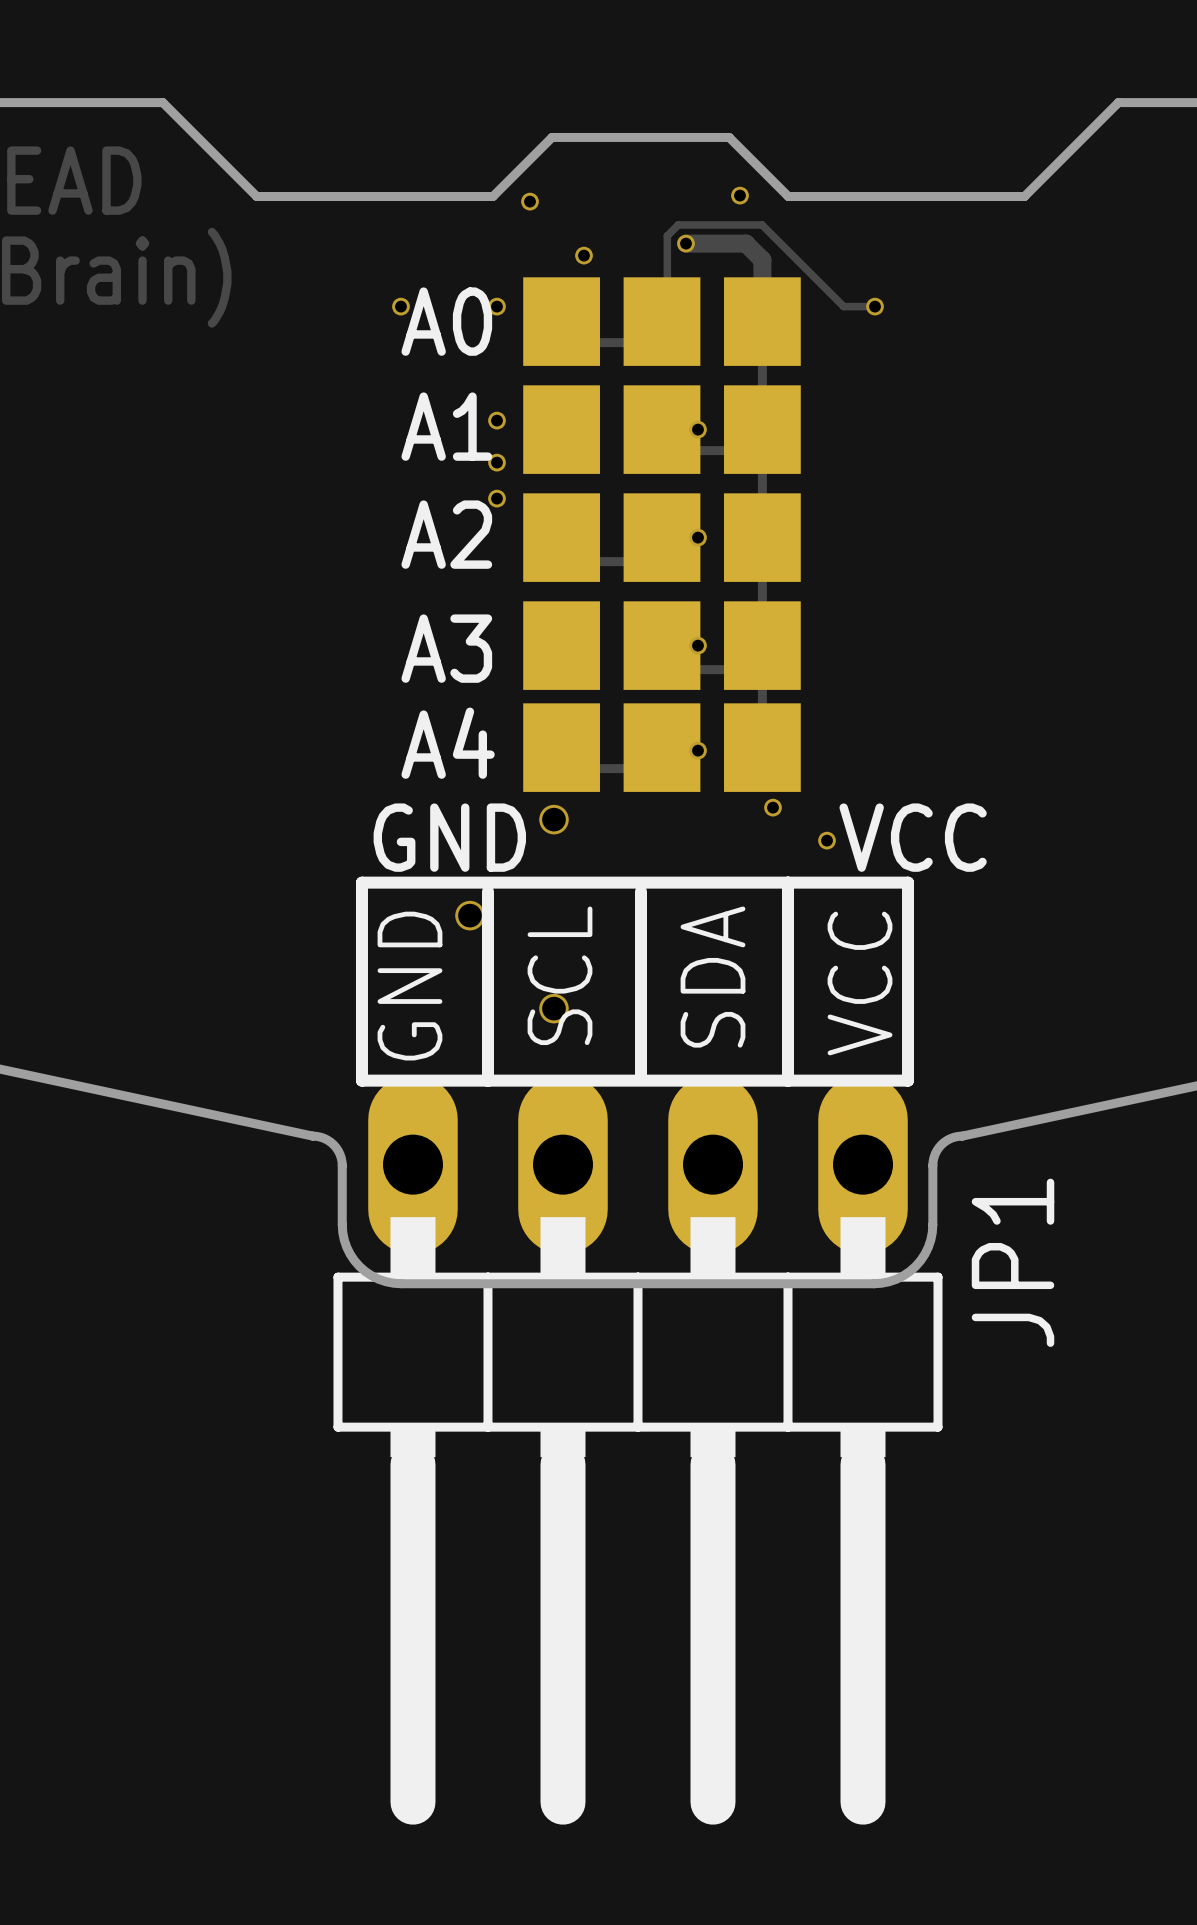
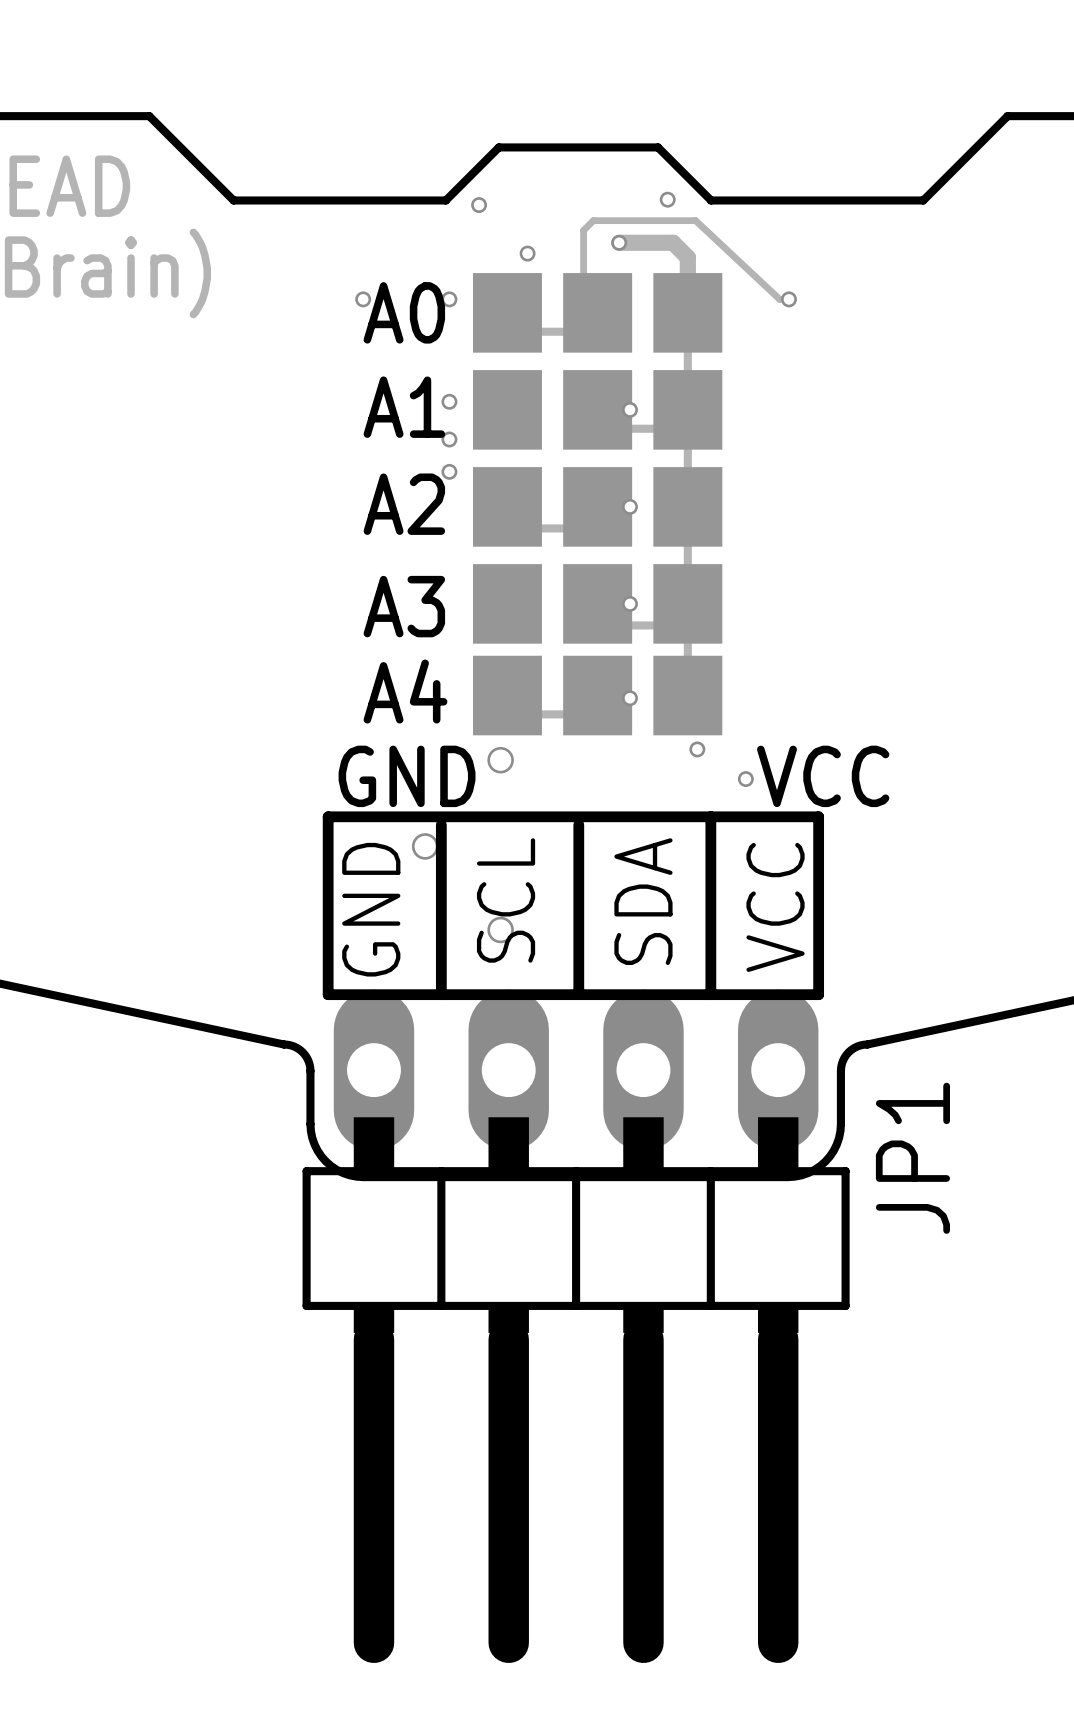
track: (864, 306) (843, 306) (762, 224) (678, 224) (667, 235) (667, 316) -> (779, 299) (695, 220) (593, 220) (583, 230) (583, 285) (602, 308)

